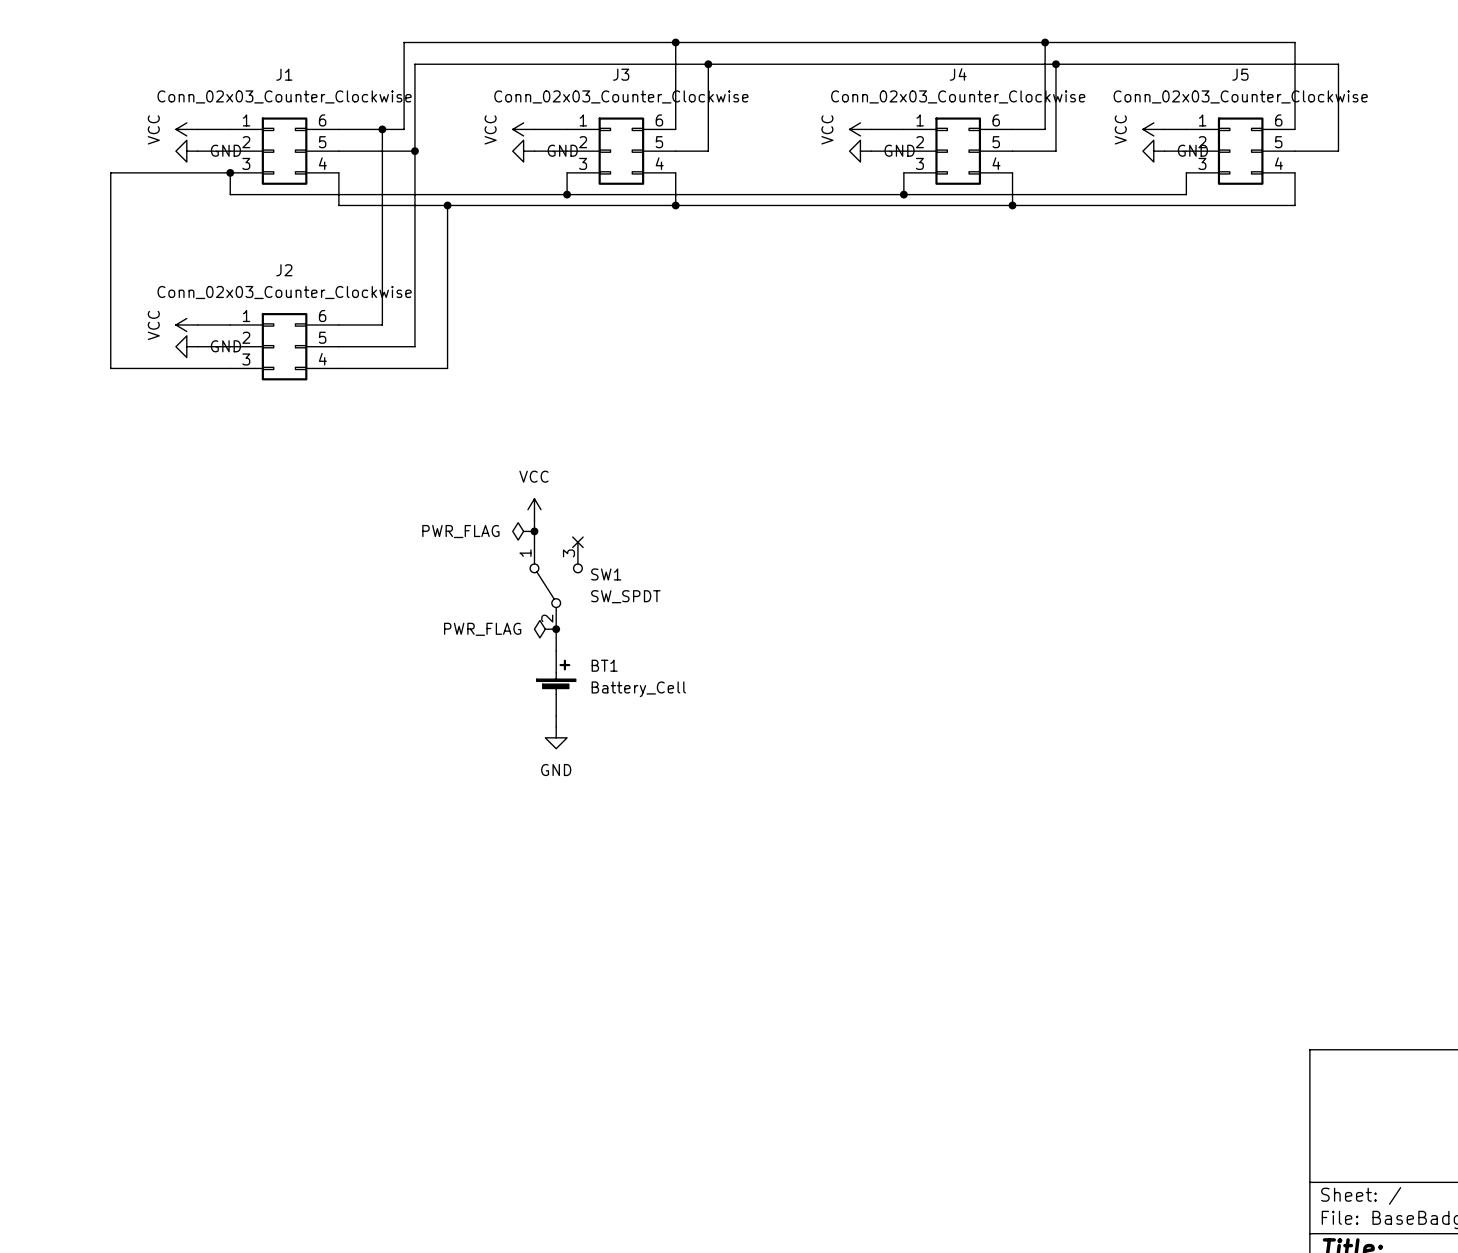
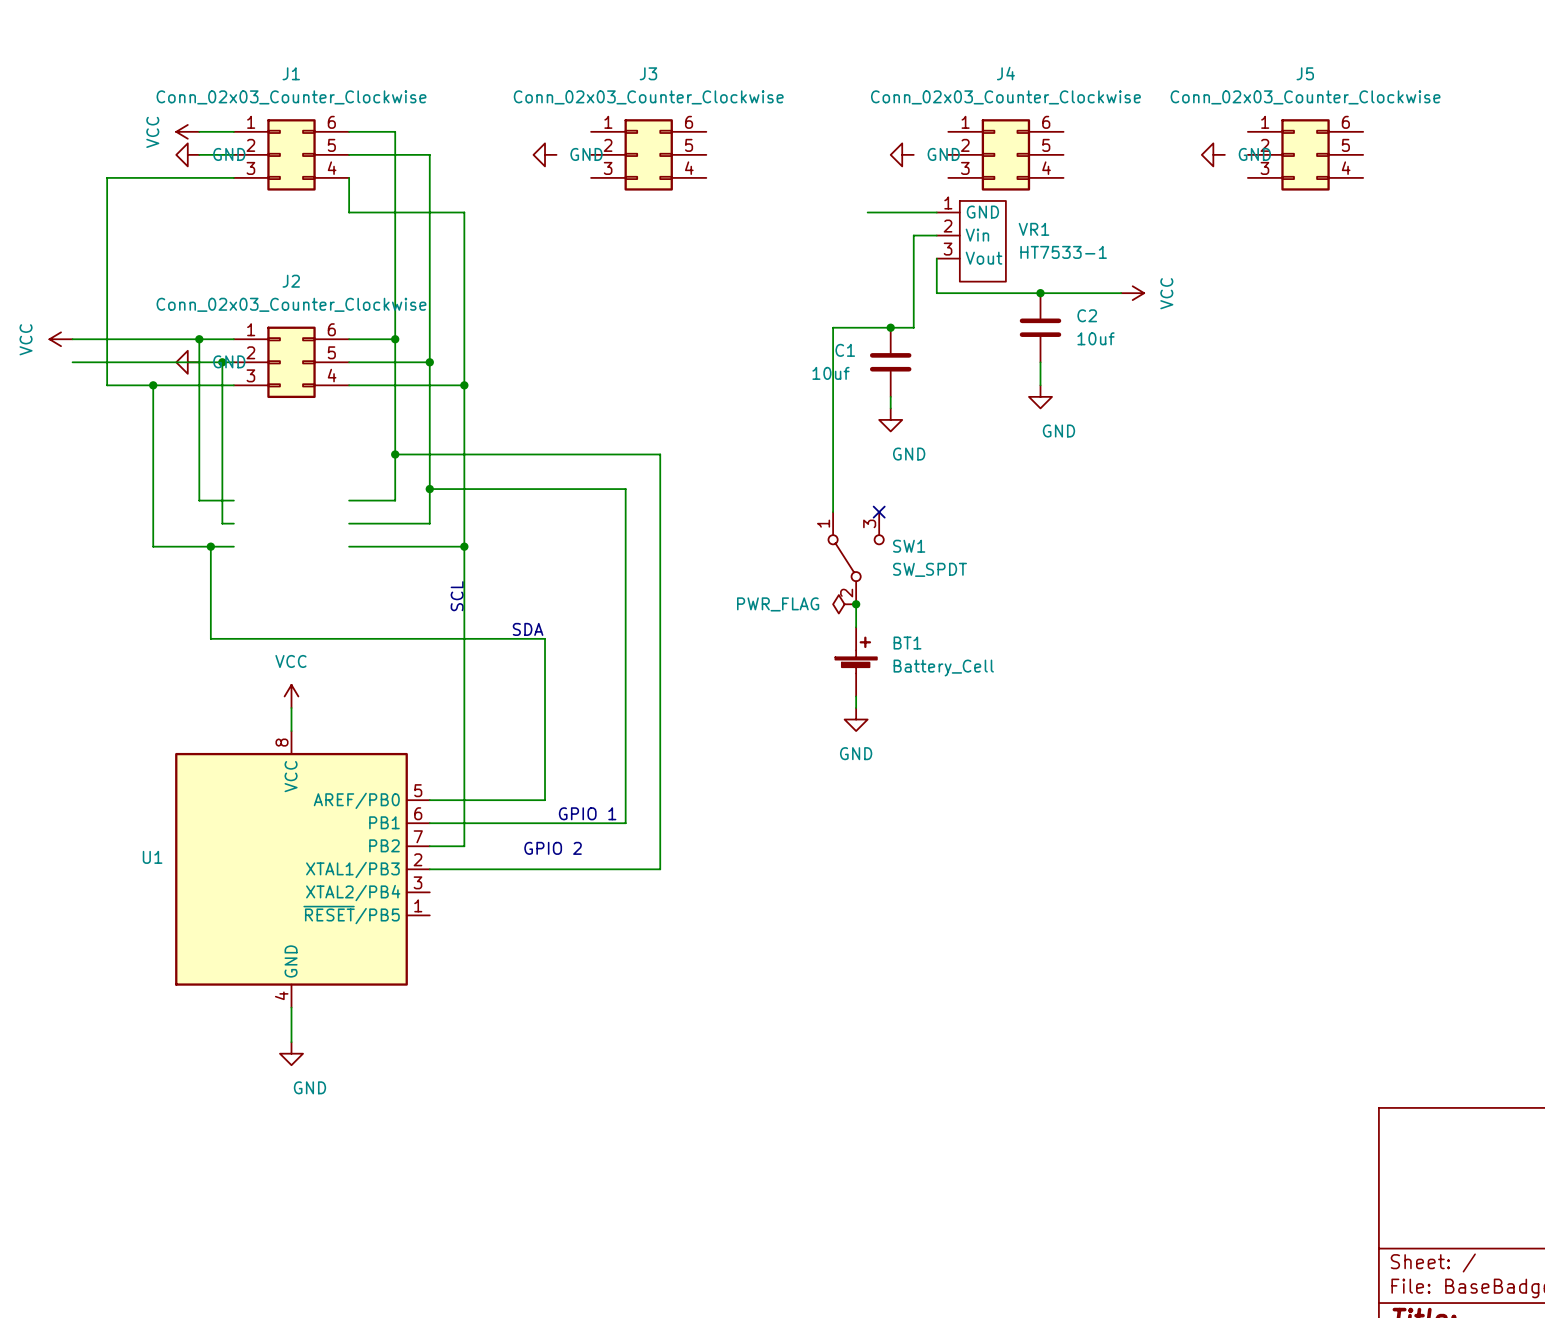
wire: (675, 42) (675, 129) -> none
junction: (675, 42) -> none
wire: (1045, 42) (1045, 129) (1012, 129) -> none
junction: (1045, 42) -> none
wire: (708, 64) (708, 151) (675, 151) -> none
junction: (708, 64) -> none
wire: (1055, 64) (1055, 151) (1012, 151) -> none
junction: (1055, 64) -> none
wire: (382, 129) (404, 129) (404, 42) (1295, 42) (1295, 129) -> none
junction: (382, 129) -> none
power symbol: VCC (523, 129) -> none
wire: (534, 129) (567, 129) -> none
power symbol: VCC (860, 129) -> none
wire: (871, 129) (903, 129) -> none
power symbol: VCC (1153, 129) -> none
wire: (1164, 129) (1186, 129) -> none
wire: (414, 151) (414, 64) (1338, 64) (1338, 151) (1295, 151) -> none
junction: (414, 151) -> none
wire: (534, 151) (567, 151) -> none
wire: (871, 151) (903, 151) -> none
wire: (1164, 151) (1186, 151) -> none
wire: (230, 172) (230, 194) (1186, 194) (1186, 172) -> none
junction: (230, 172) -> none
wire: (567, 172) (567, 194) -> none
wire: (675, 172) (675, 205) -> none
wire: (903, 172) (903, 194) -> (1040, 362) (1040, 385)
wire: (1012, 172) (1012, 205) -> none
wire: (1295, 172) (1295, 205) (893, 205) -> none
junction: (567, 194) -> none
junction: (903, 194) -> none
wire: (447, 205) (827, 205) -> none
junction: (447, 205) -> none
junction: (675, 205) -> none
junction: (1012, 205) -> none
wire: none -> (936, 235) (913, 235) (913, 327) (833, 327) (833, 512)
VR1: none -> HT7533-1 (971, 241)
wire: none -> (936, 258) (936, 293) (1121, 293)
junction: none -> (1040, 293)
power symbol: none -> VCC (1132, 293)
junction: none -> (890, 327)
C2: none -> 10uf (1040, 327)
wire: none -> (72, 339) (199, 339) (199, 500) (233, 500)
power symbol position: VCC (186, 324) -> VCC (61, 339)
junction: none -> (199, 339)
wire: none -> (395, 339) (395, 500) (349, 500)
junction: none -> (395, 339)
wire: none -> (72, 362) (199, 362)
wire: none -> (222, 362) (222, 523) (233, 523)
junction: none -> (222, 362)
wire: none -> (429, 362) (429, 523) (349, 523)
junction: none -> (429, 362)
C1: none -> 10uf (890, 362)
wire: none -> (153, 385) (153, 546) (233, 546)
junction: none -> (153, 385)
wire: none -> (464, 385) (464, 846) (429, 846)
junction: none -> (464, 385)
wire: none -> (890, 396) (890, 408)
power symbol: none -> GND (1040, 396)
power symbol: none -> GND (890, 419)
wire: none -> (395, 454) (660, 454) (660, 869) (429, 869)
junction: none -> (395, 454)
wire: none -> (429, 489) (625, 489) (625, 823) (429, 823)
junction: none -> (429, 489)
no-connect mark: none -> (879, 512)
power symbol: VCC (534, 509) -> none
wire: none -> (210, 546) (210, 638) (545, 638) (545, 800) (429, 800)
junction: none -> (210, 546)
wire: none -> (349, 546) (464, 546)
junction: none -> (464, 546)
wire: (534, 520) (534, 542) -> none
power symbol: PWR_FLAG (523, 531) -> none
junction: (534, 531) -> none
no-connect mark: (577, 542) -> none
text: none -> SCL (457, 596)
power symbol: none -> PWR_FLAG (844, 604)
wire: none -> (856, 604) (856, 627)
junction: none -> (856, 604)
SW1 position: (556, 585) -> (856, 558)
text: none -> SDA (528, 629)
power symbol: PWR_FLAG (545, 629) -> none
wire: (556, 629) (556, 650) -> none
junction: (556, 629) -> none
power symbol: none -> VCC (291, 696)
wire: none -> (856, 696) (856, 707)
wire: none -> (291, 707) (291, 731)
BT1 position: (556, 683) -> (856, 661)
power symbol: none -> GND (856, 719)
wire: (556, 716) (556, 726) -> none
power symbol: GND (556, 737) -> none
text: none -> GPIO 1 (587, 813)
text: none -> GPIO 2 (553, 848)
U1: none -> (302, 869)
wire: none -> (291, 1007) (291, 1042)
power symbol: none -> GND (291, 1053)

